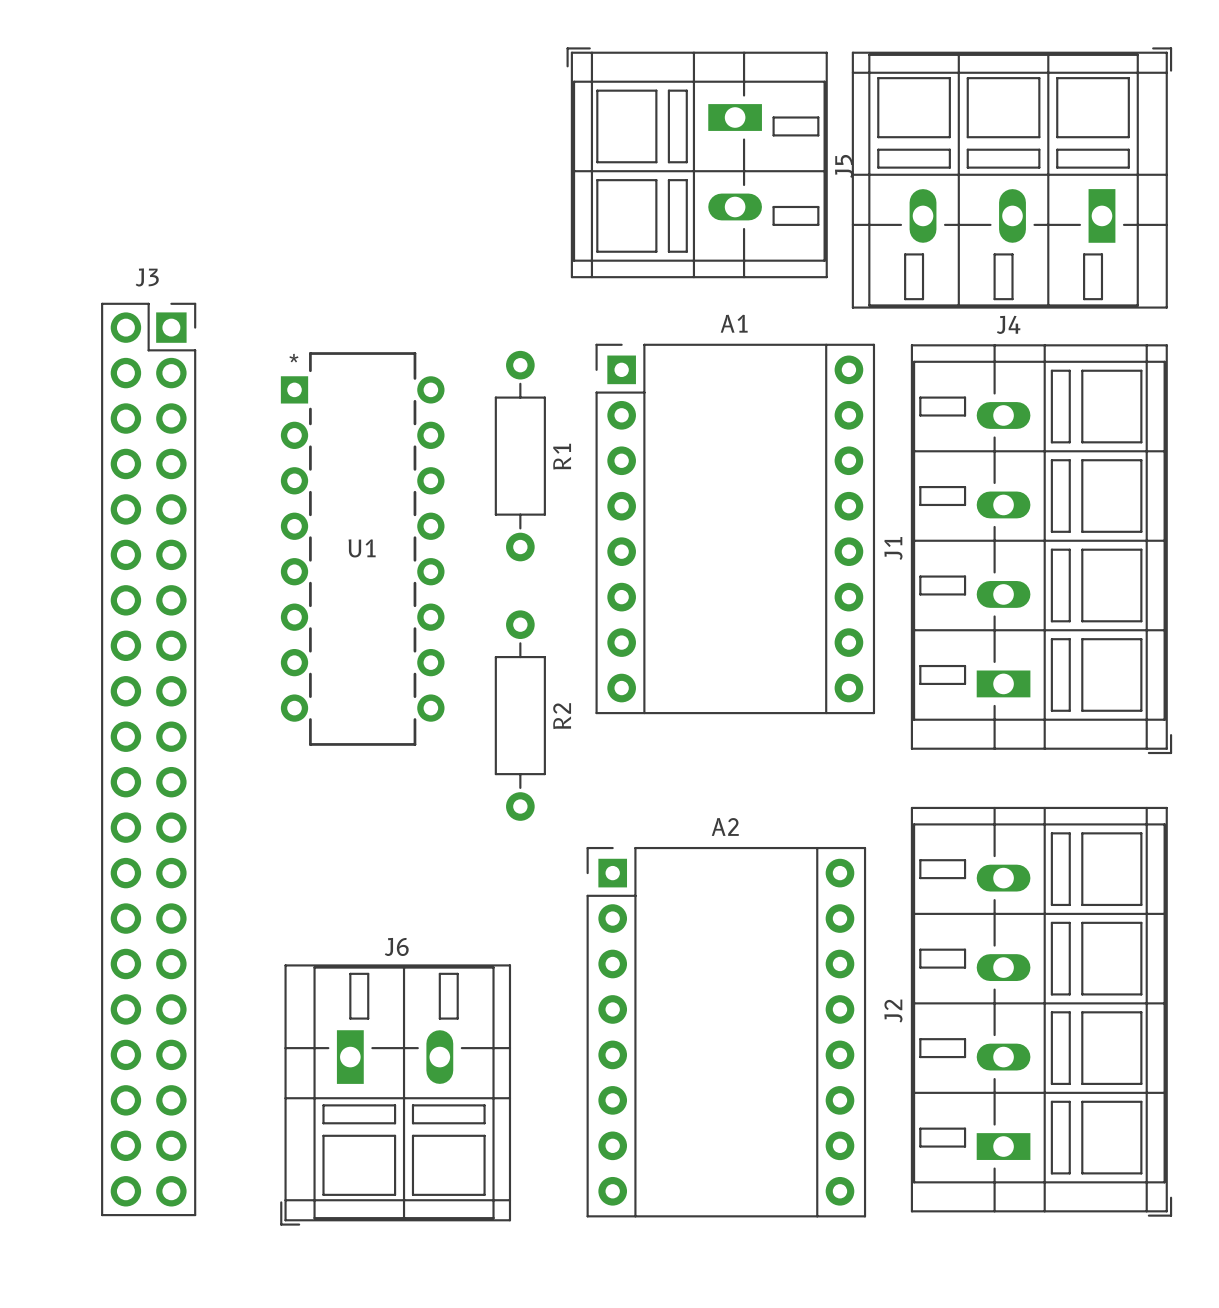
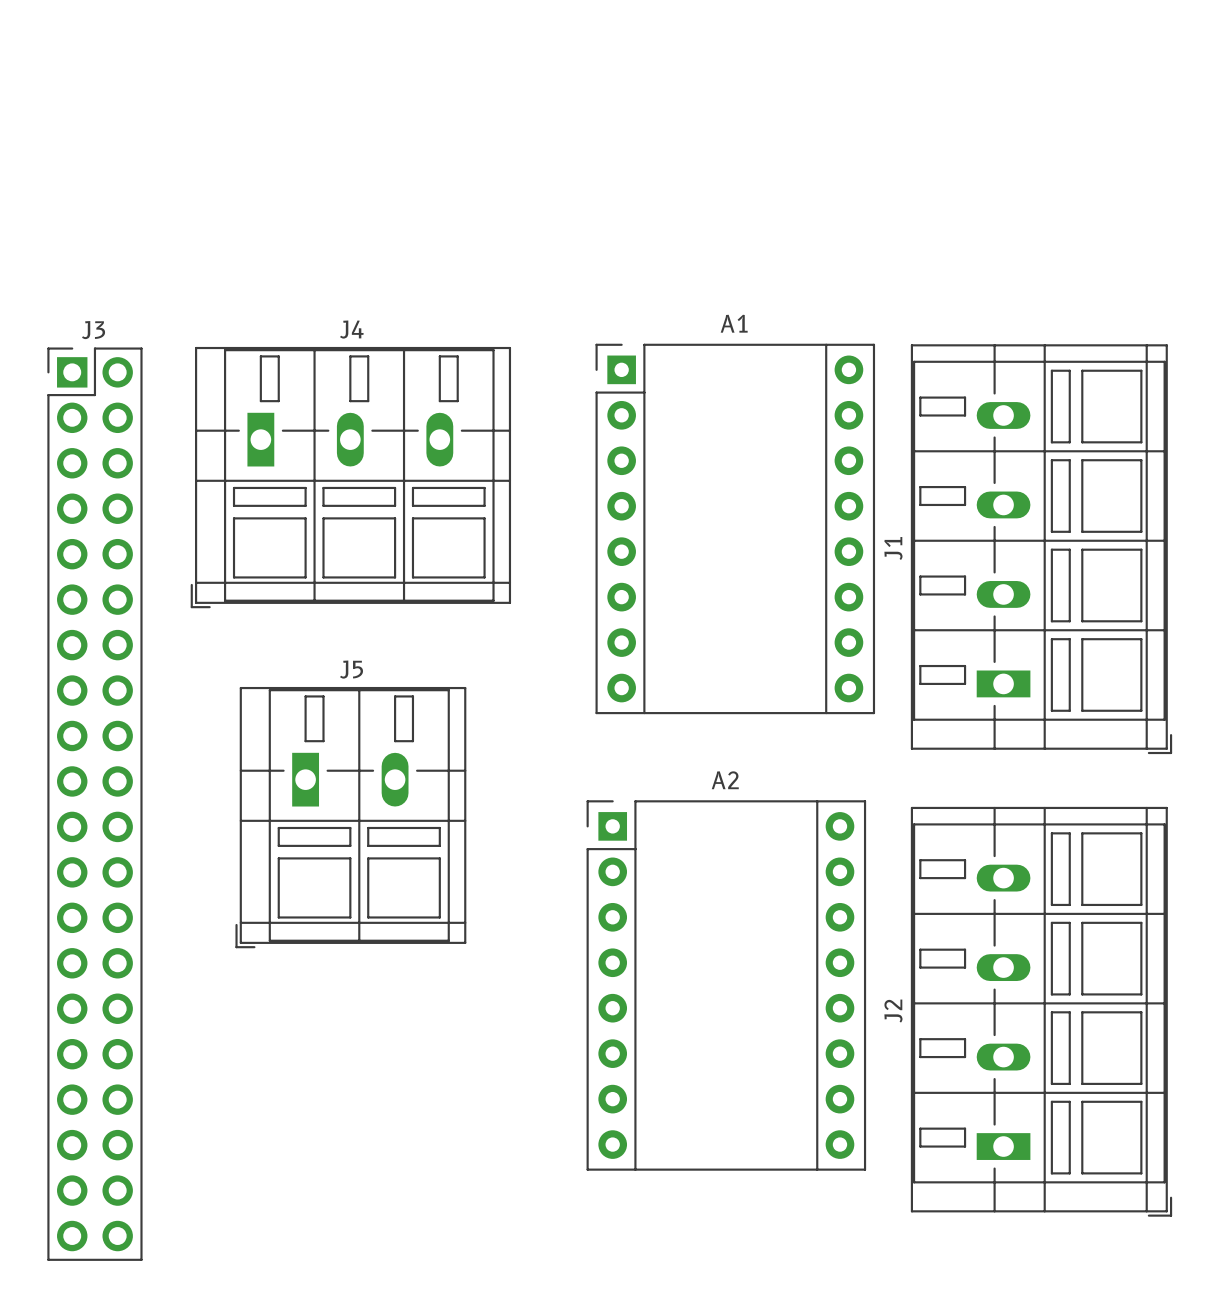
J5 rotation: 0° (697, 162) -> 90° counterclockwise (350, 817)
J5 position: (697, 162) -> (350, 817)
J4 rotation: 0° (1011, 178) -> 180° (350, 477)
J4 position: (1011, 178) -> (350, 477)
J3 footprint: [101, 302, 197, 1217] -> [47, 347, 143, 1261]
R1: (520, 456) -> none
U1: (362, 548) -> none
R2: (520, 715) -> none
A2 position: (726, 1032) -> (726, 985)
J6: (395, 1095) -> none

